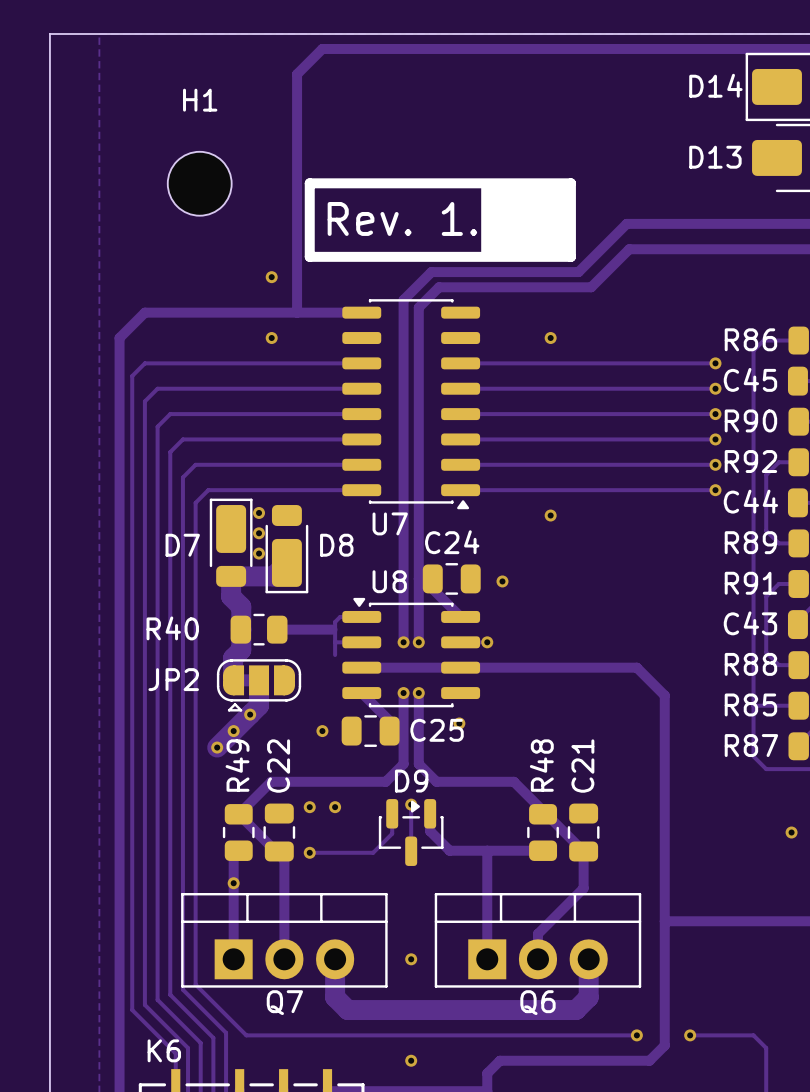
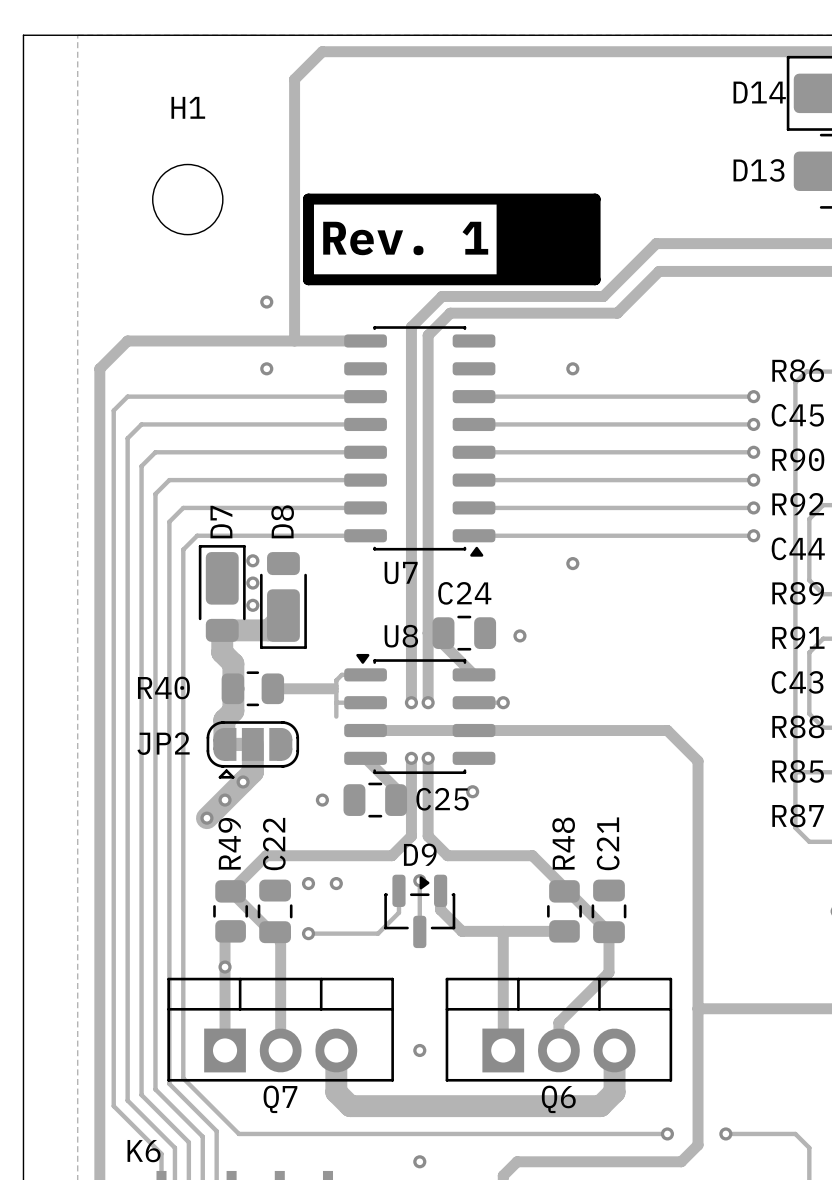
D7 name rotation: 0° (182, 545) -> 90° counterclockwise (221, 522)
D7 name position: D7 (182, 545) -> D7 (221, 522)
D8 name rotation: 0° (336, 545) -> 90° counterclockwise (282, 521)
D8 name position: D8 (336, 545) -> D8 (282, 521)

